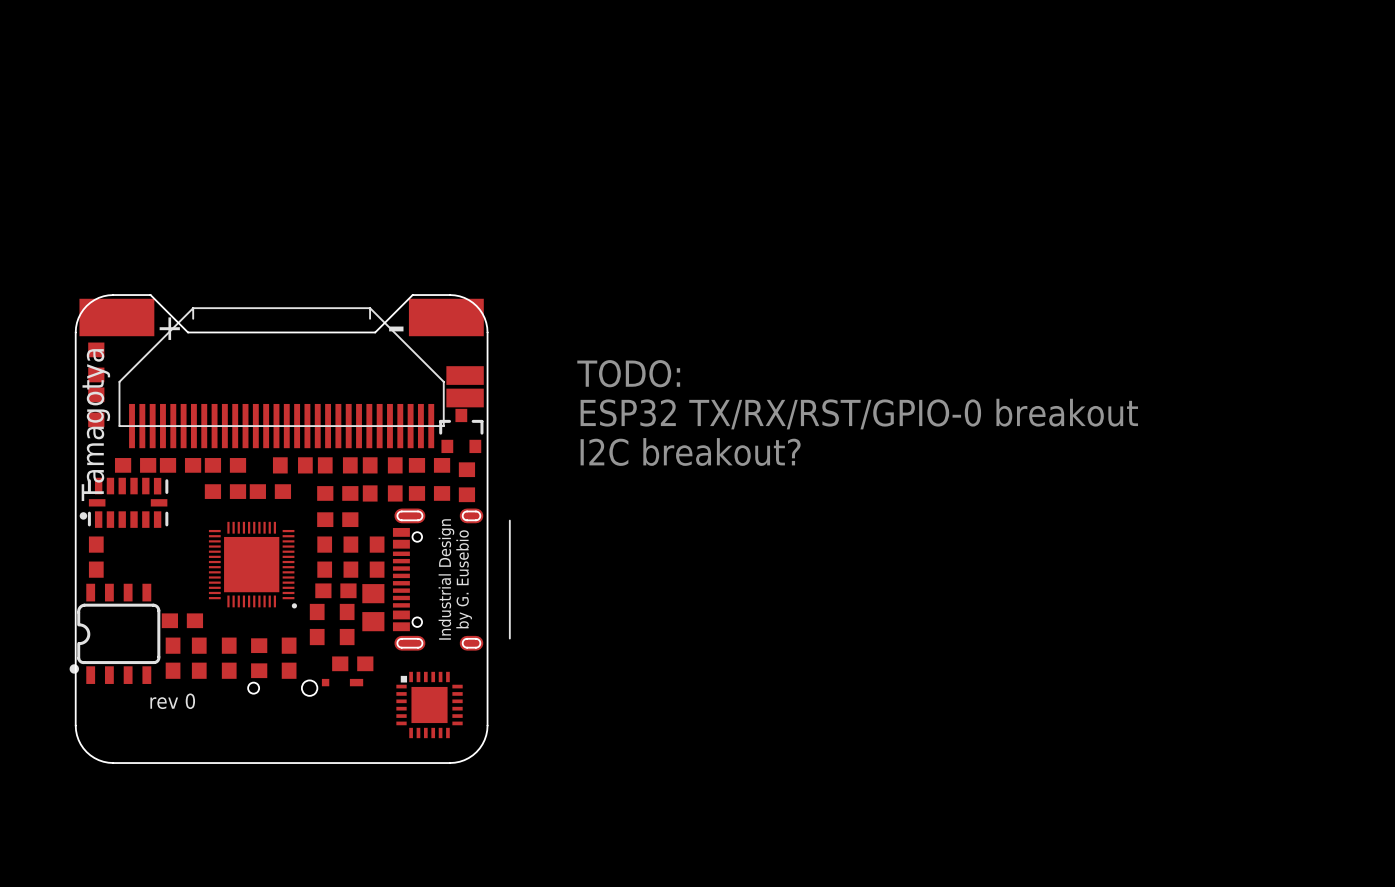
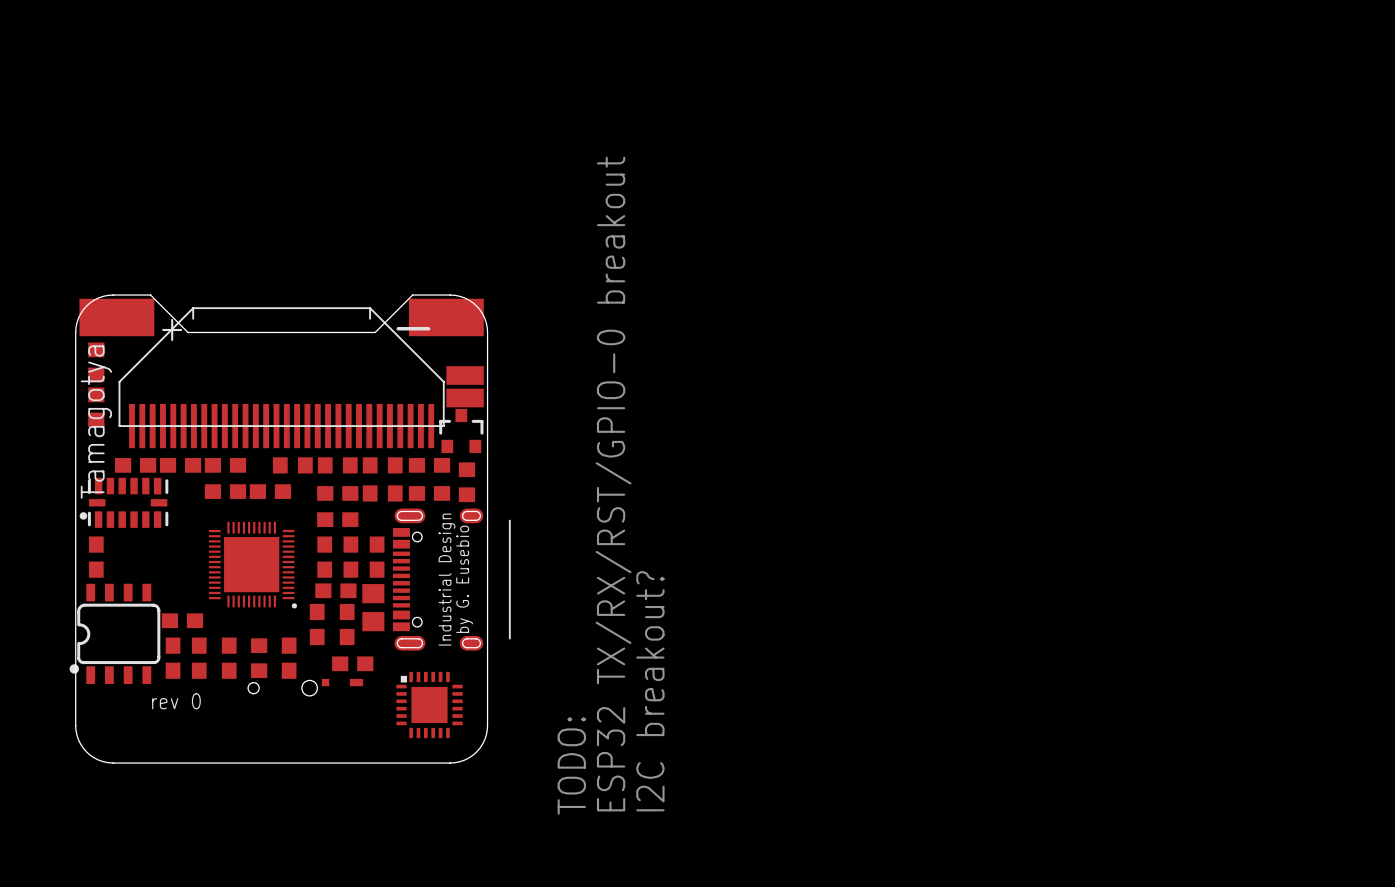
text: TODO: (628, 373) -> none
text: ESP32 TX/RX/RST/GPIO-0 breakout (859, 414) -> none
text: I2C breakout? (690, 451) -> none
text: none -> ESP32 TX/RX/RST/GPIO-0 breakout (613, 484)
text: none -> I2C breakout? (650, 691)
text: none -> TODO: (571, 765)

